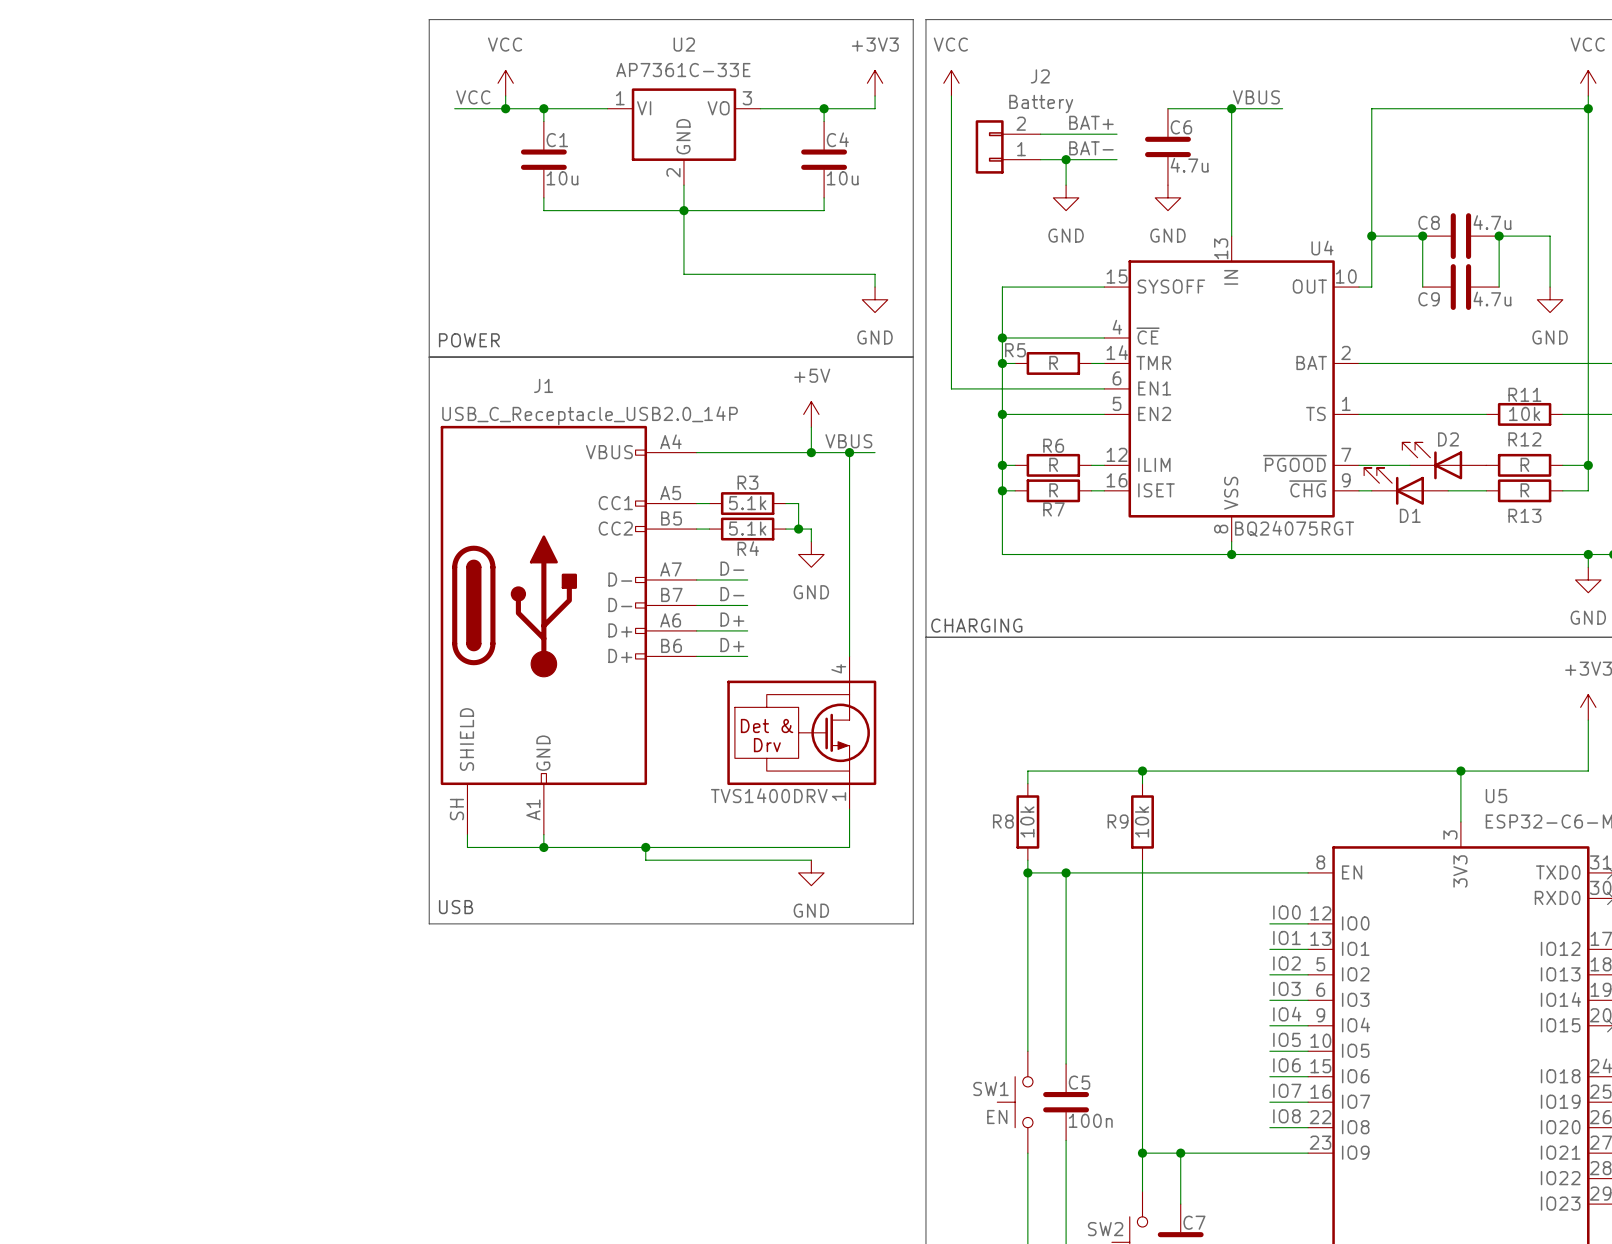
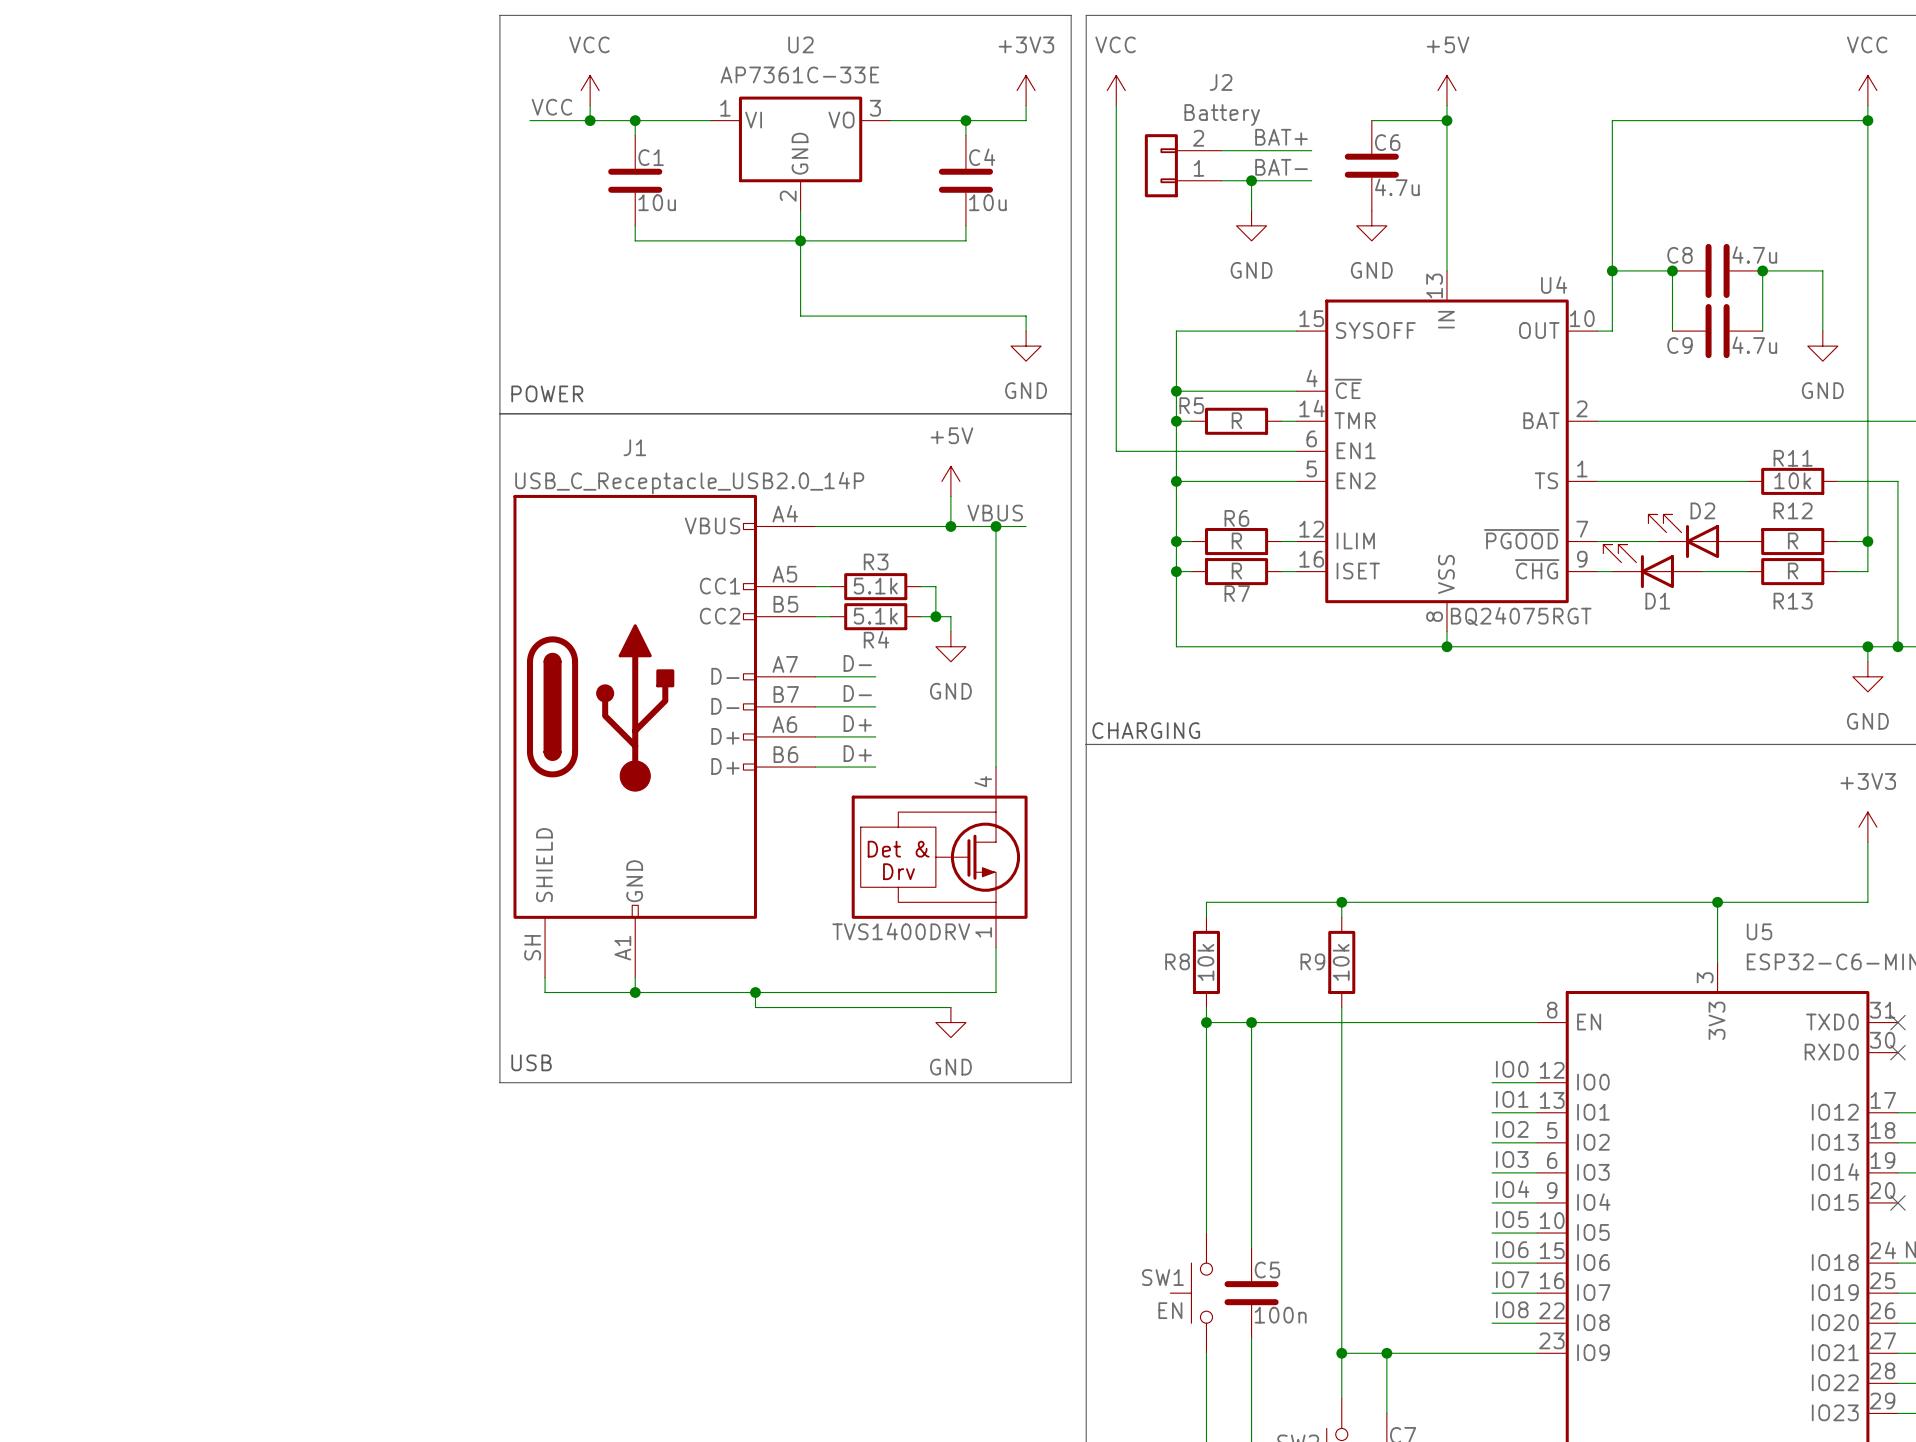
power symbol: none -> +5V (1446, 90)
label: VBUS (1256, 97) -> none
wire: (1231, 108) (1282, 108) -> (1446, 120) (1446, 105)

